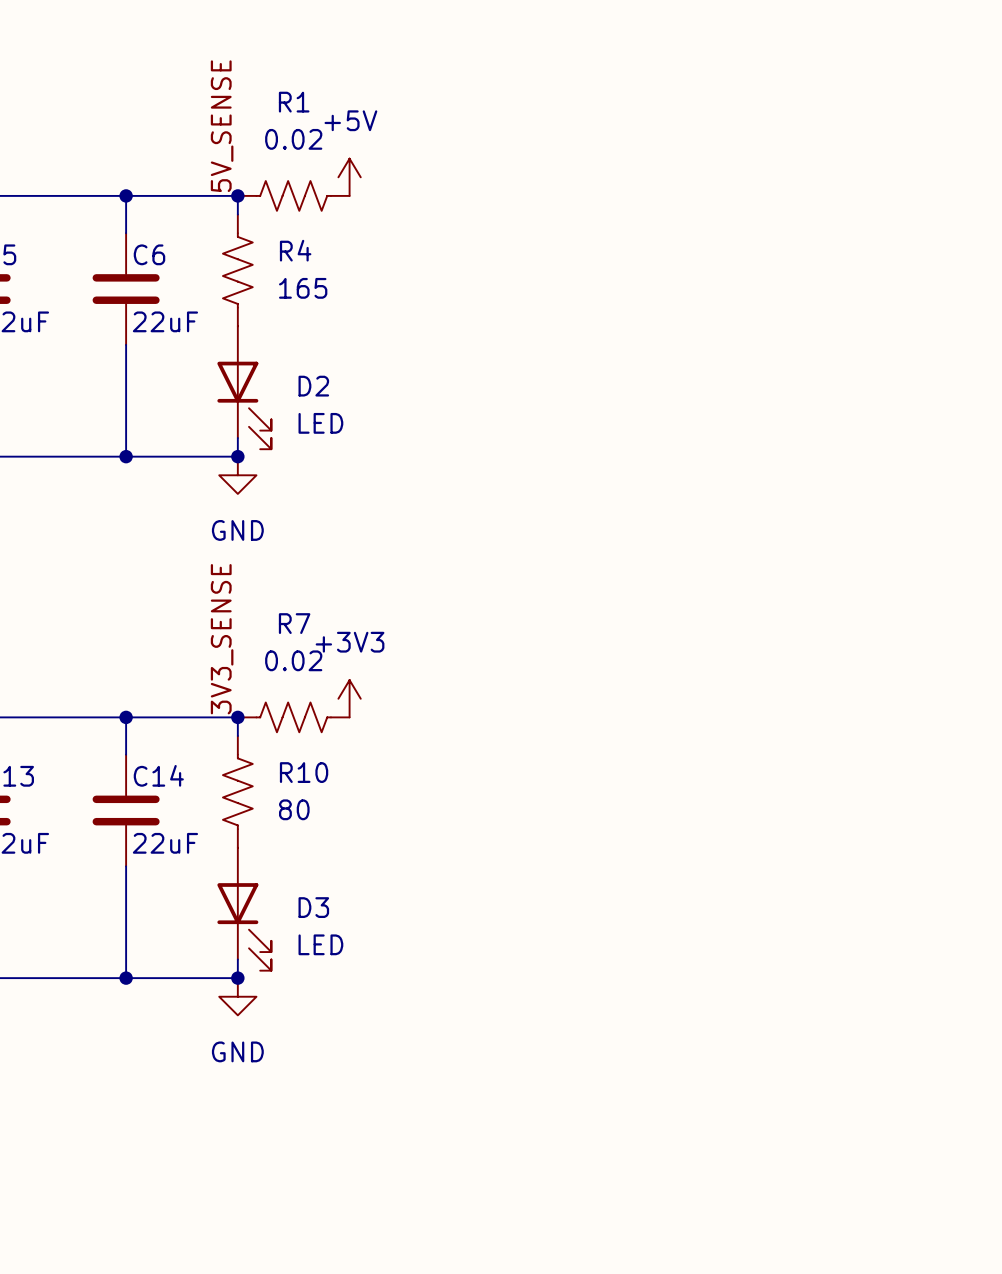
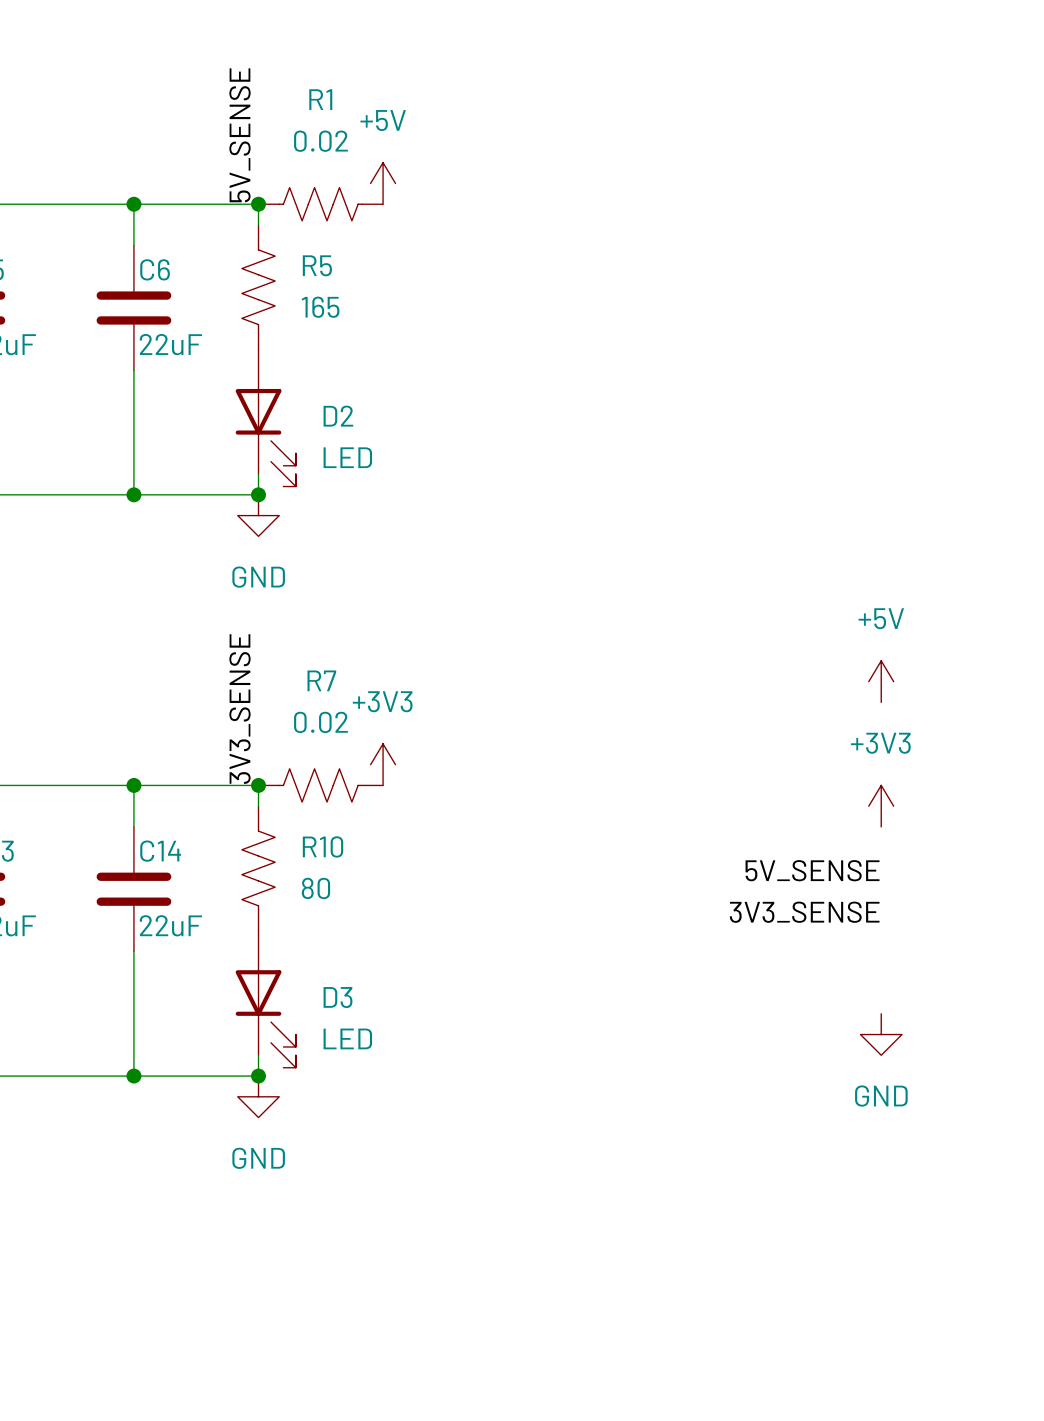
R4 name: R4 (295, 250) -> R5 (317, 265)
power symbol: none -> +5V (881, 681)
power symbol: none -> +3V3 (881, 806)
label: none -> 5V_SENSE (812, 870)
label: none -> 3V3_SENSE (804, 912)
power symbol: none -> GND (881, 1034)

